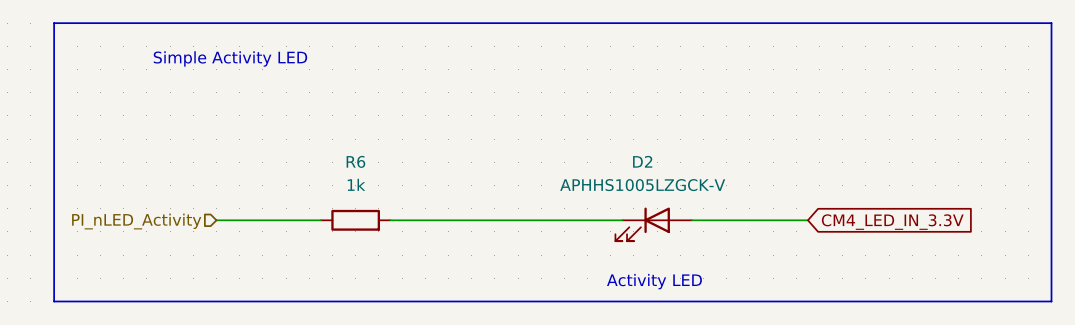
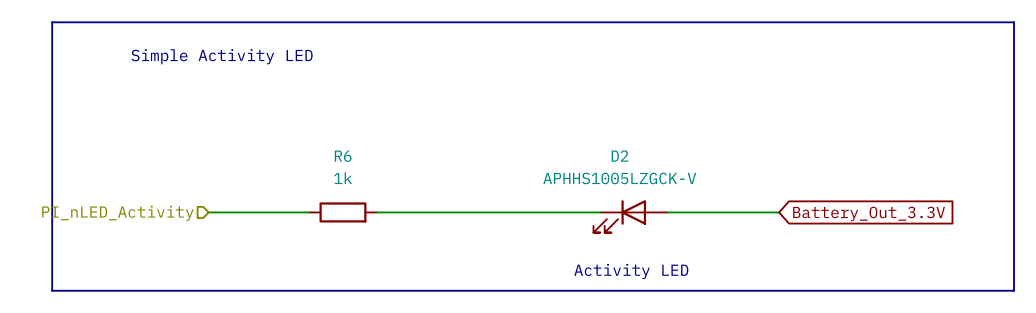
global label: CM4_LED_IN_3.3V (892, 222) -> Battery_Out_3.3V (869, 213)

